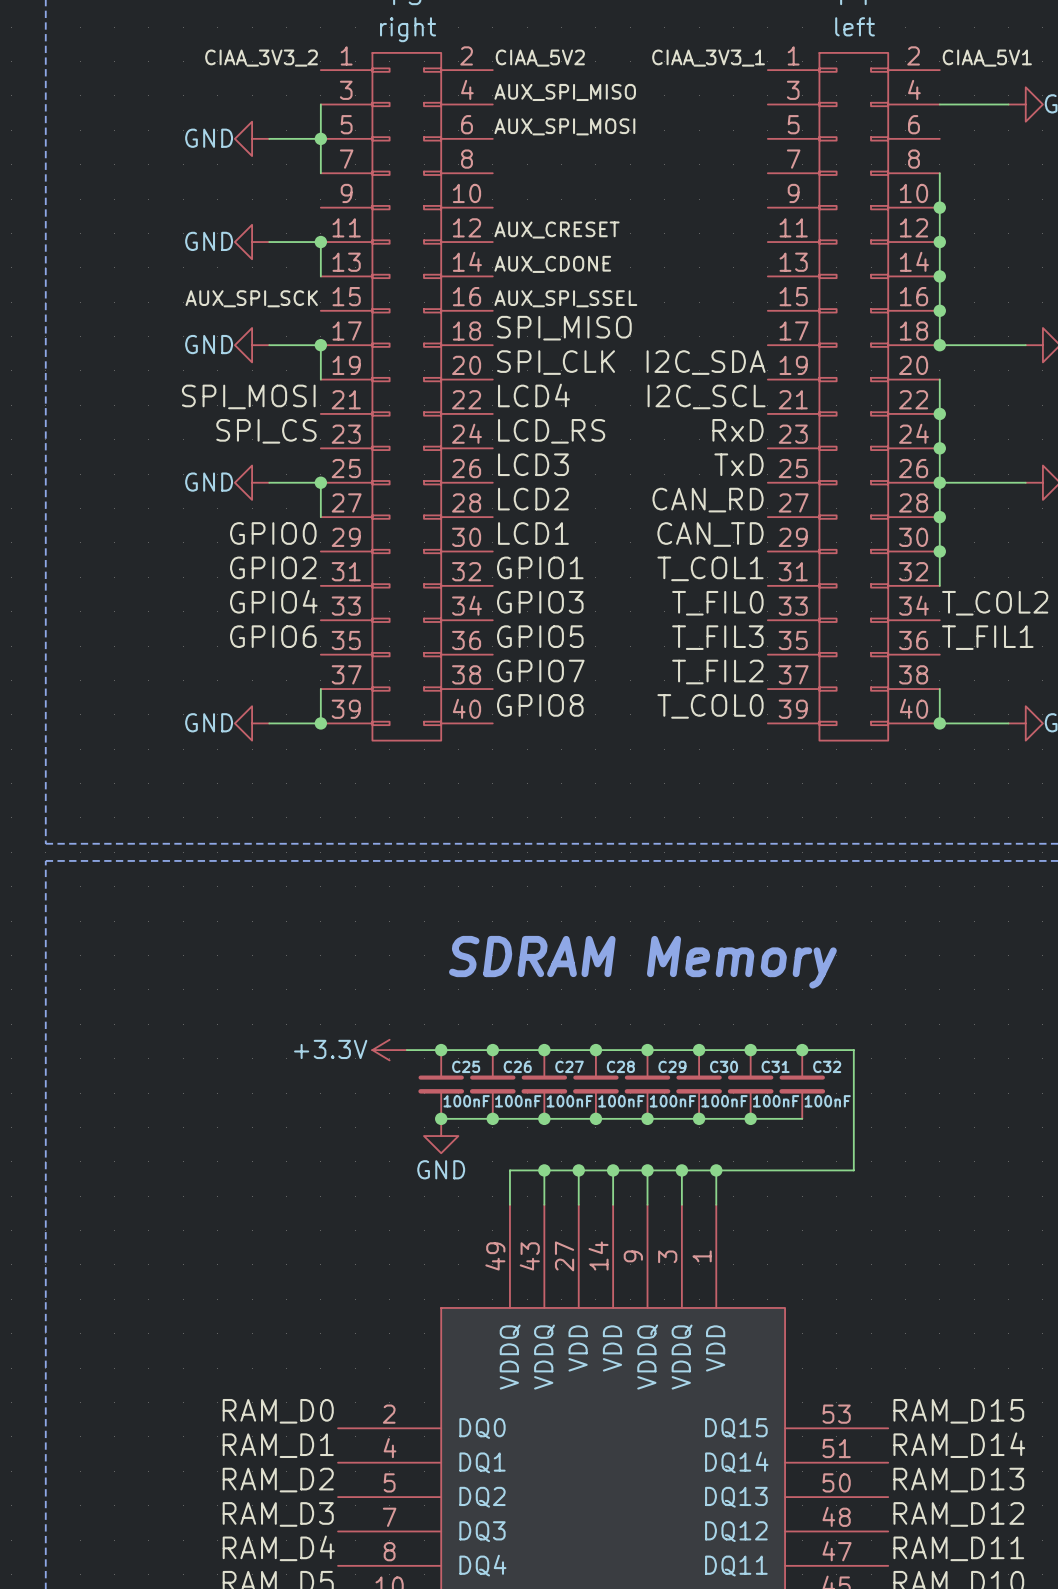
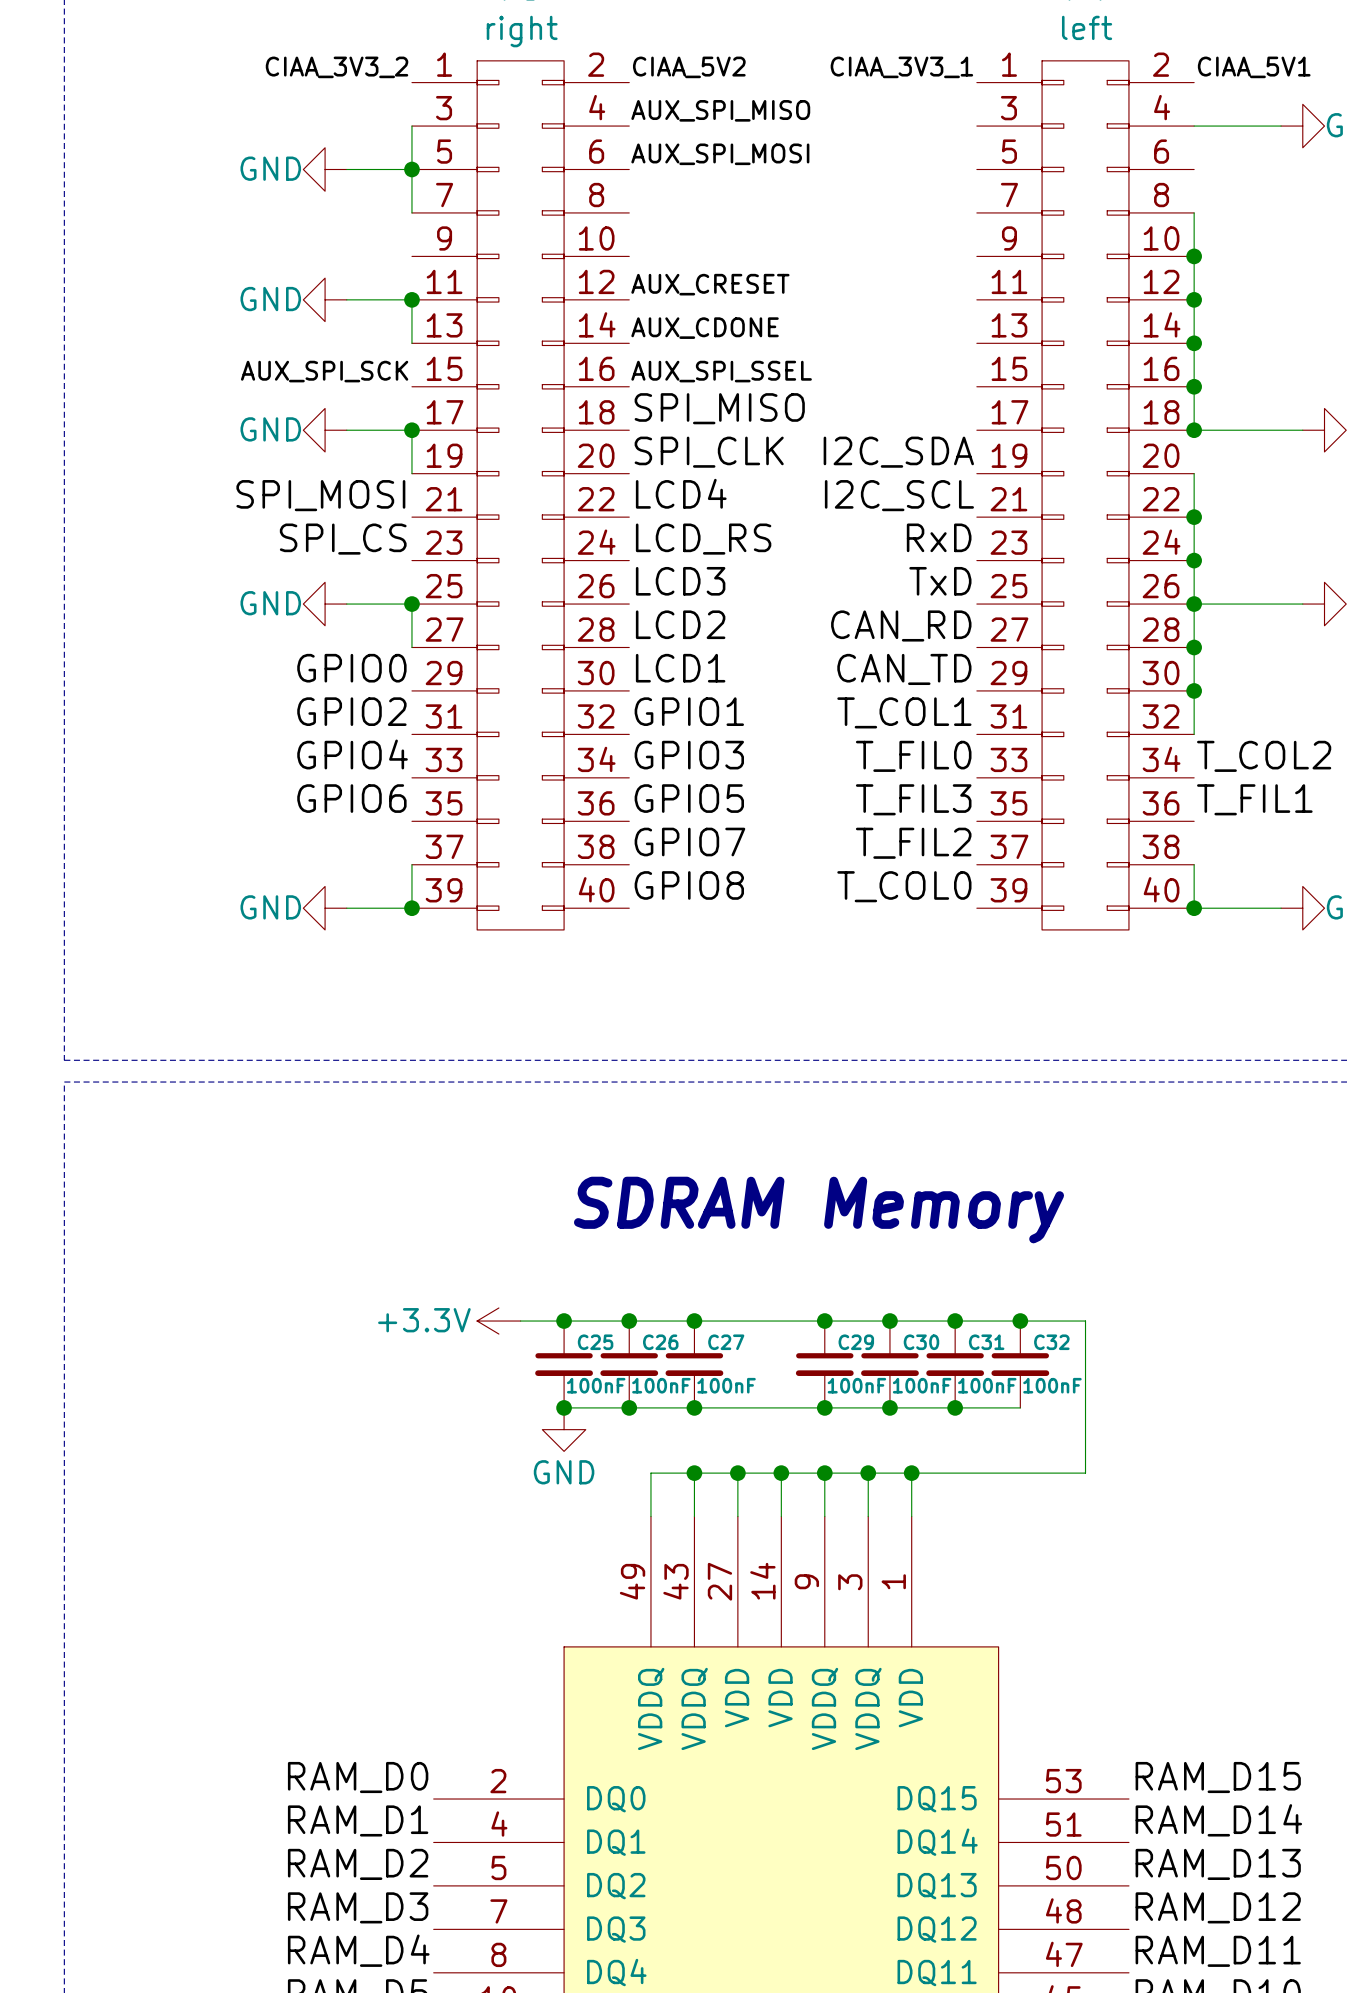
junction: (595, 1050) -> none
C28: 100nF (595, 1084) -> none
junction: (595, 1118) -> none

